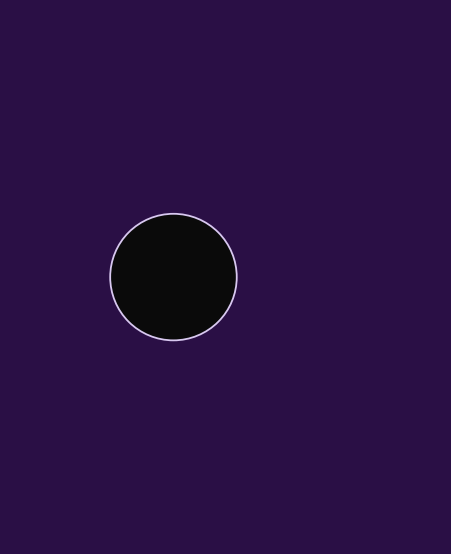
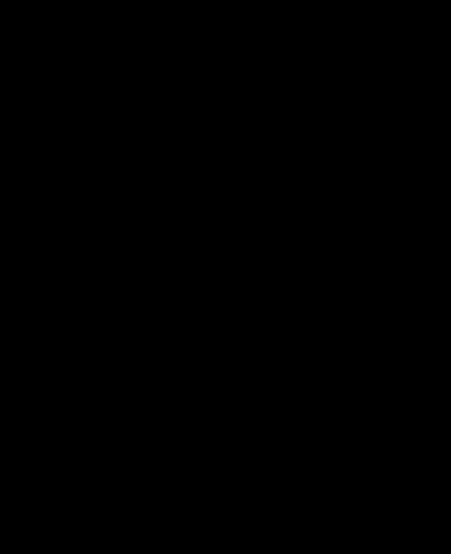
part: (173, 277) -> none

